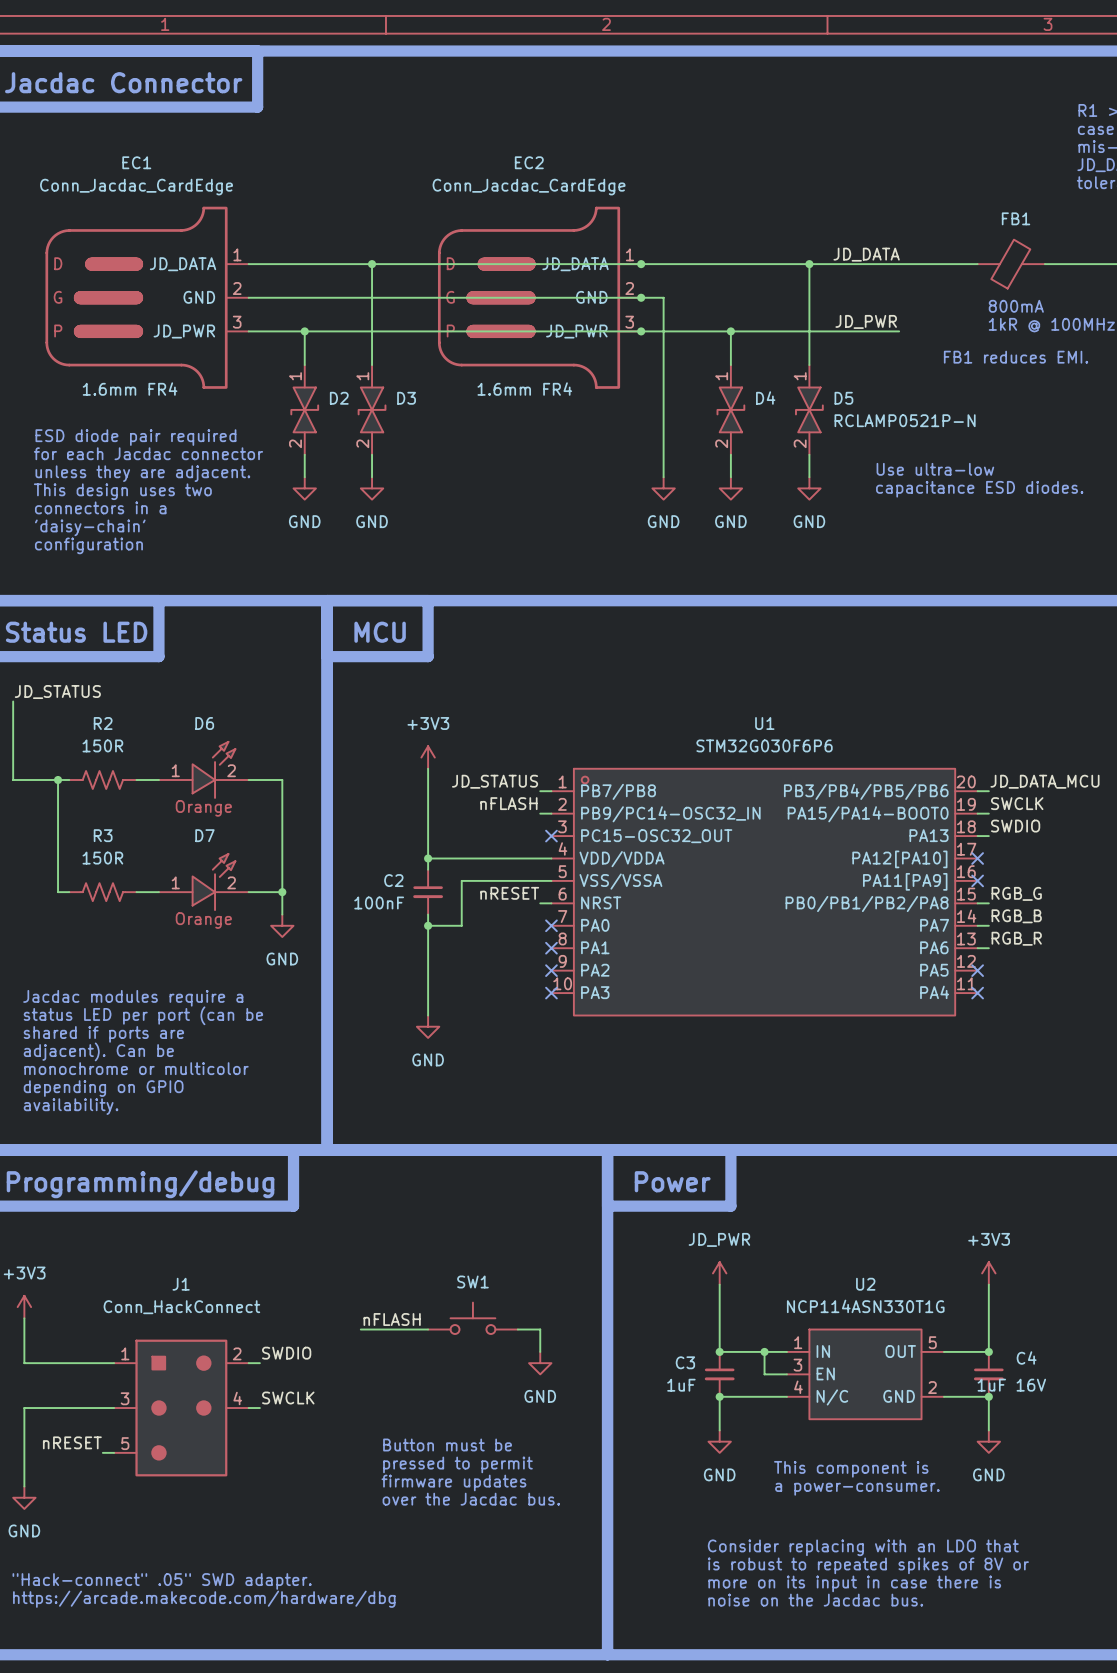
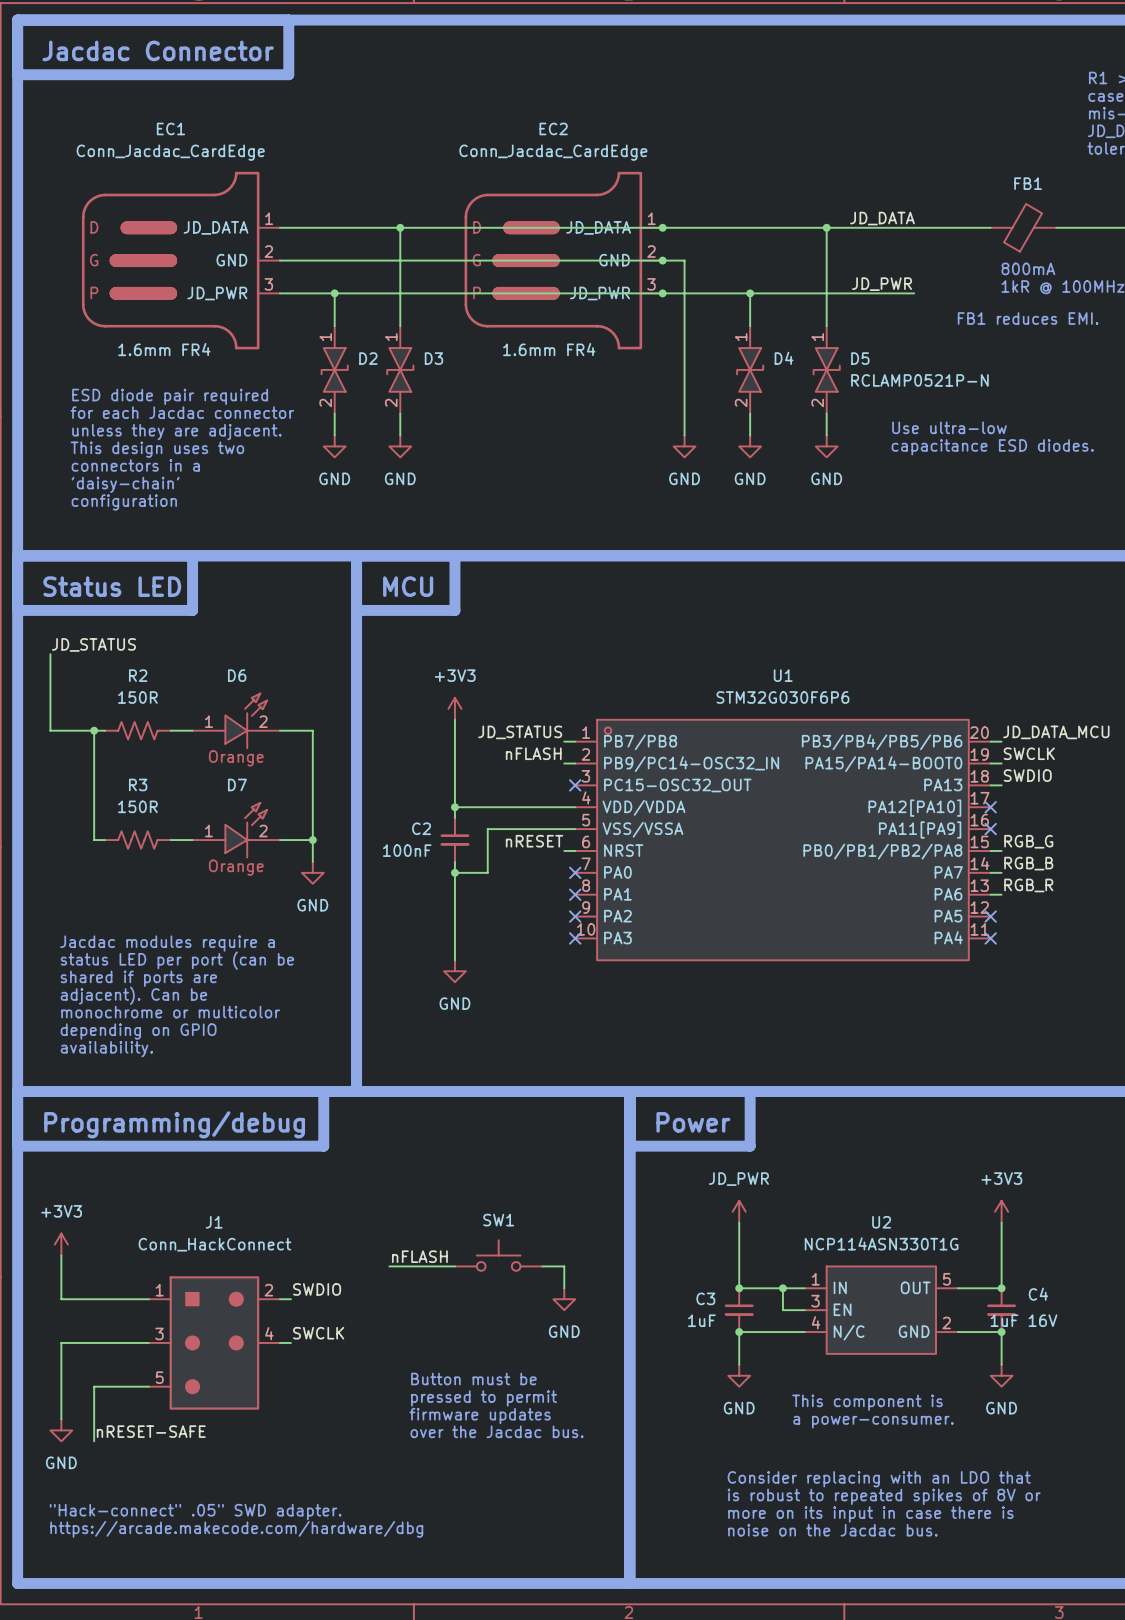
label: nRESET (72, 1442) -> none
wire: none -> (137, 1386) (94, 1386) (94, 1441)
label: none -> nRESET-SAFE (151, 1431)

